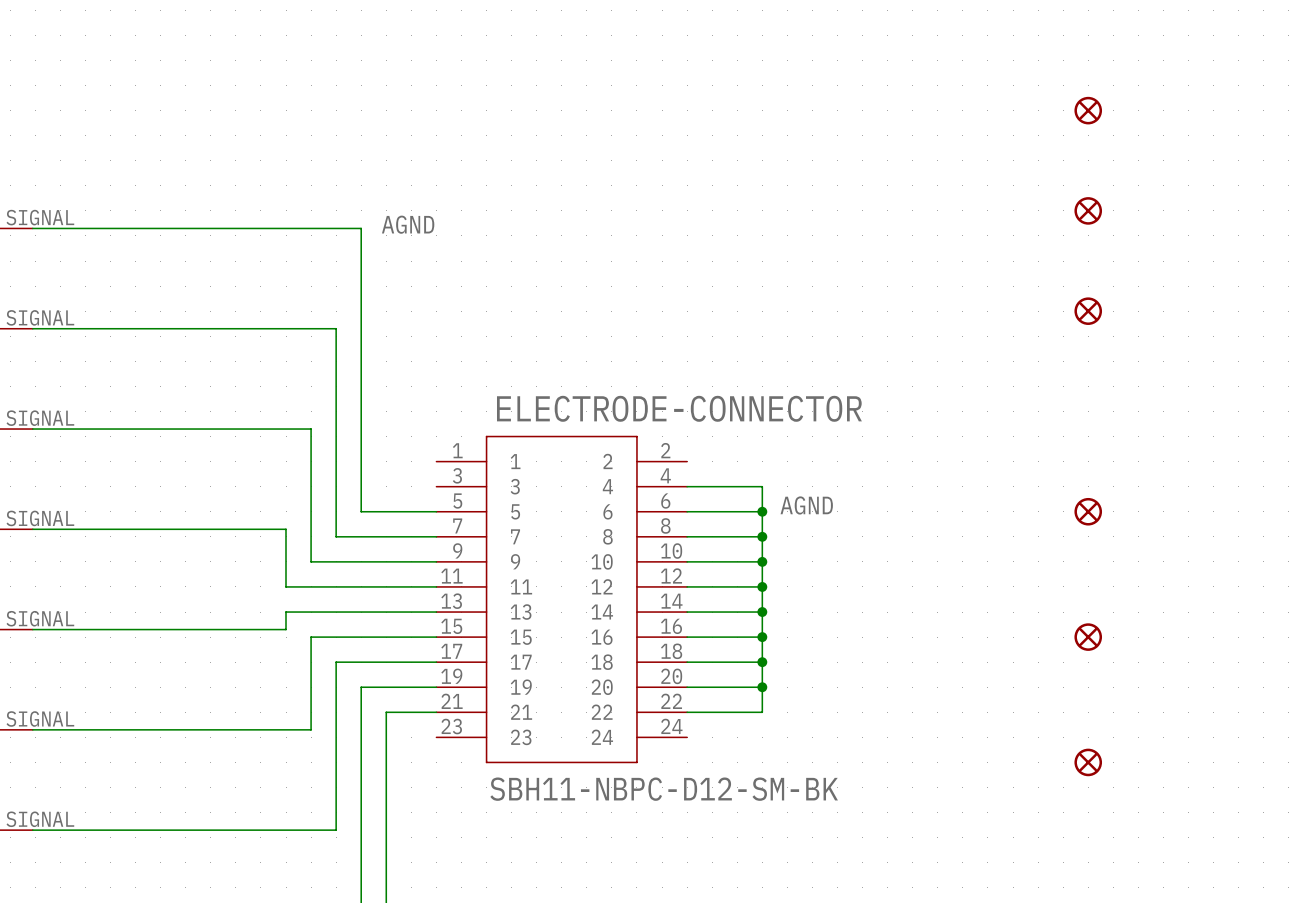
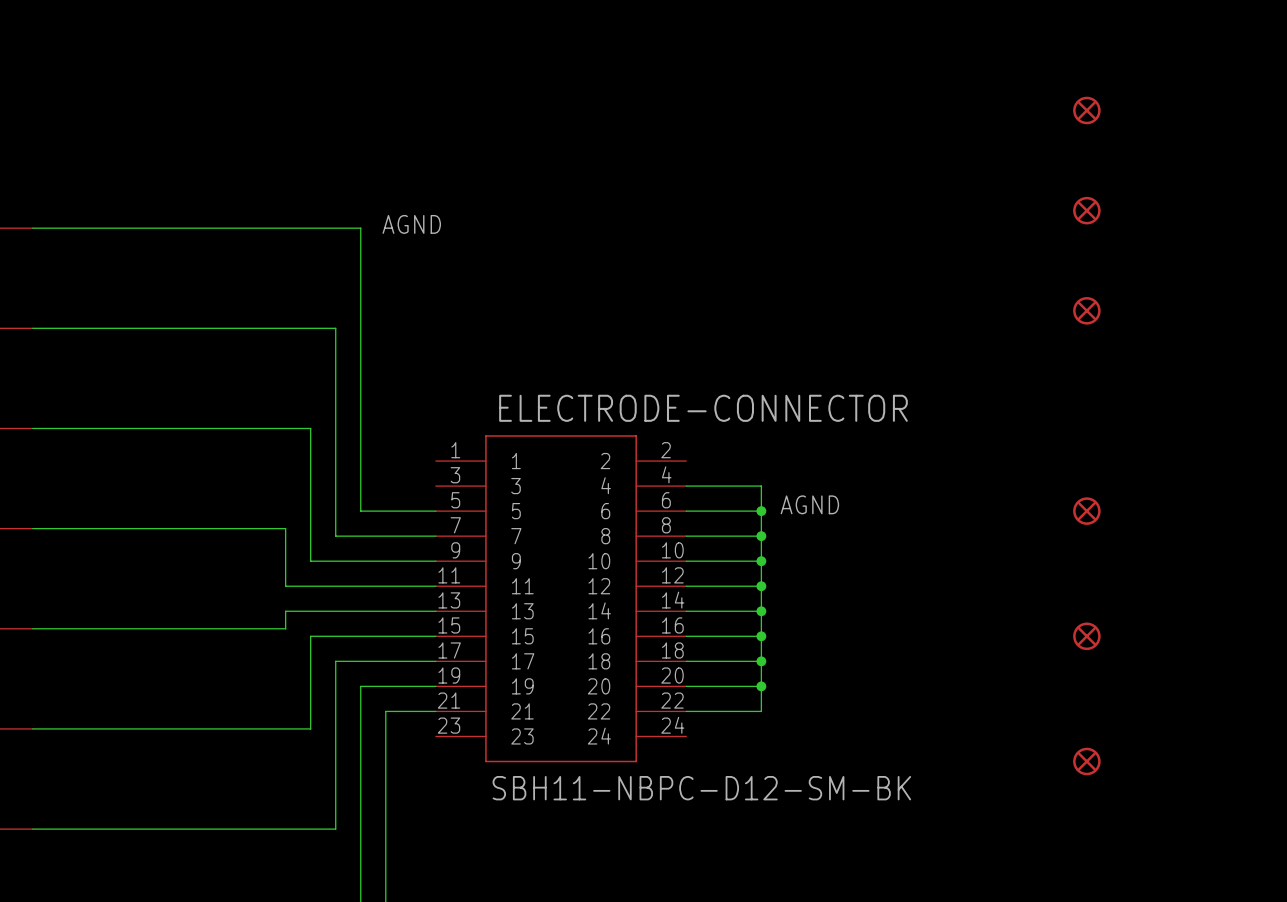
part pin number: SIGNAL (40, 217) -> none
part pin number: SIGNAL (40, 317) -> none
part pin number: SIGNAL (40, 418) -> none
part pin number: SIGNAL (40, 518) -> none
part pin number: SIGNAL (40, 618) -> none
part pin number: SIGNAL (40, 719) -> none
part pin number: SIGNAL (40, 819) -> none

